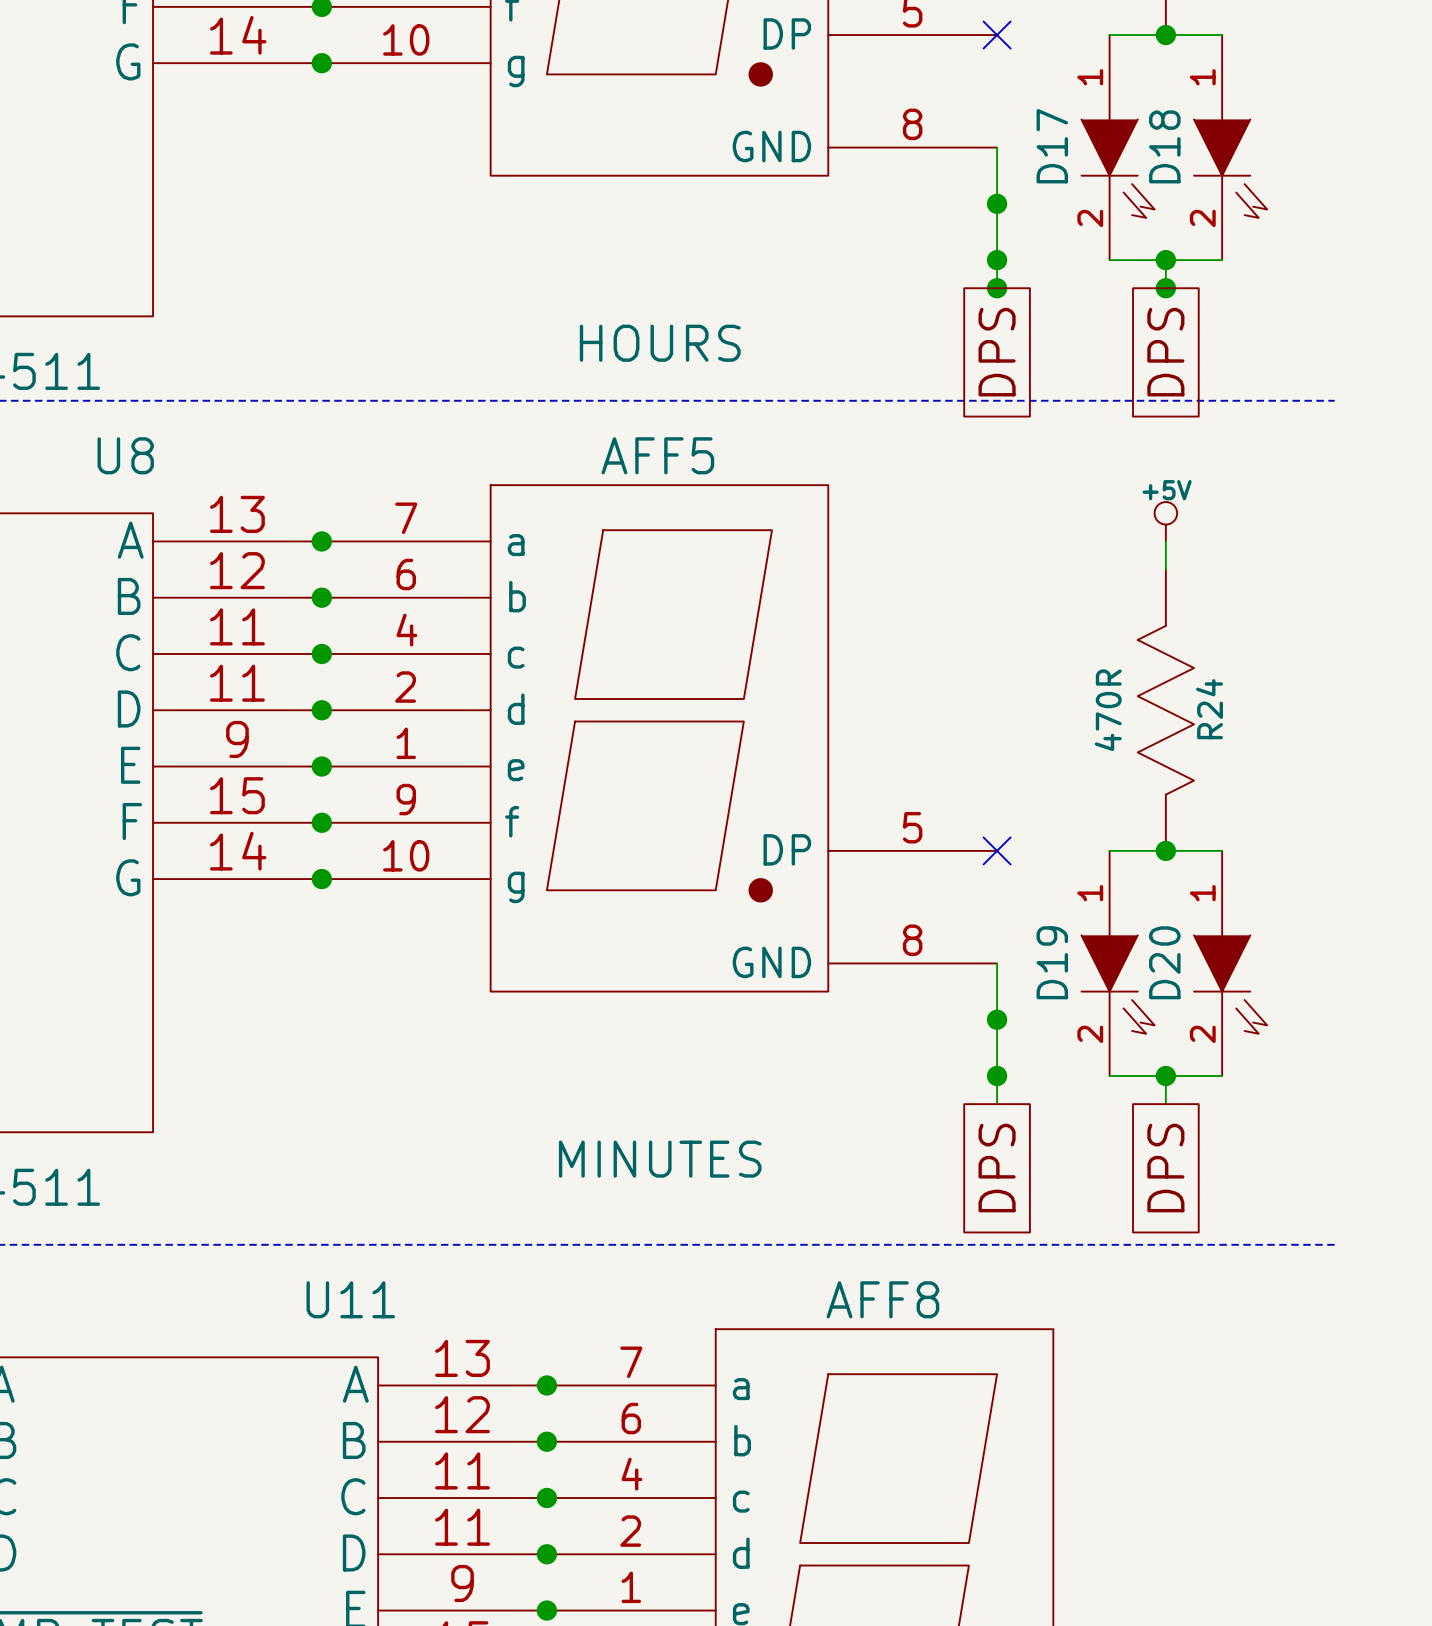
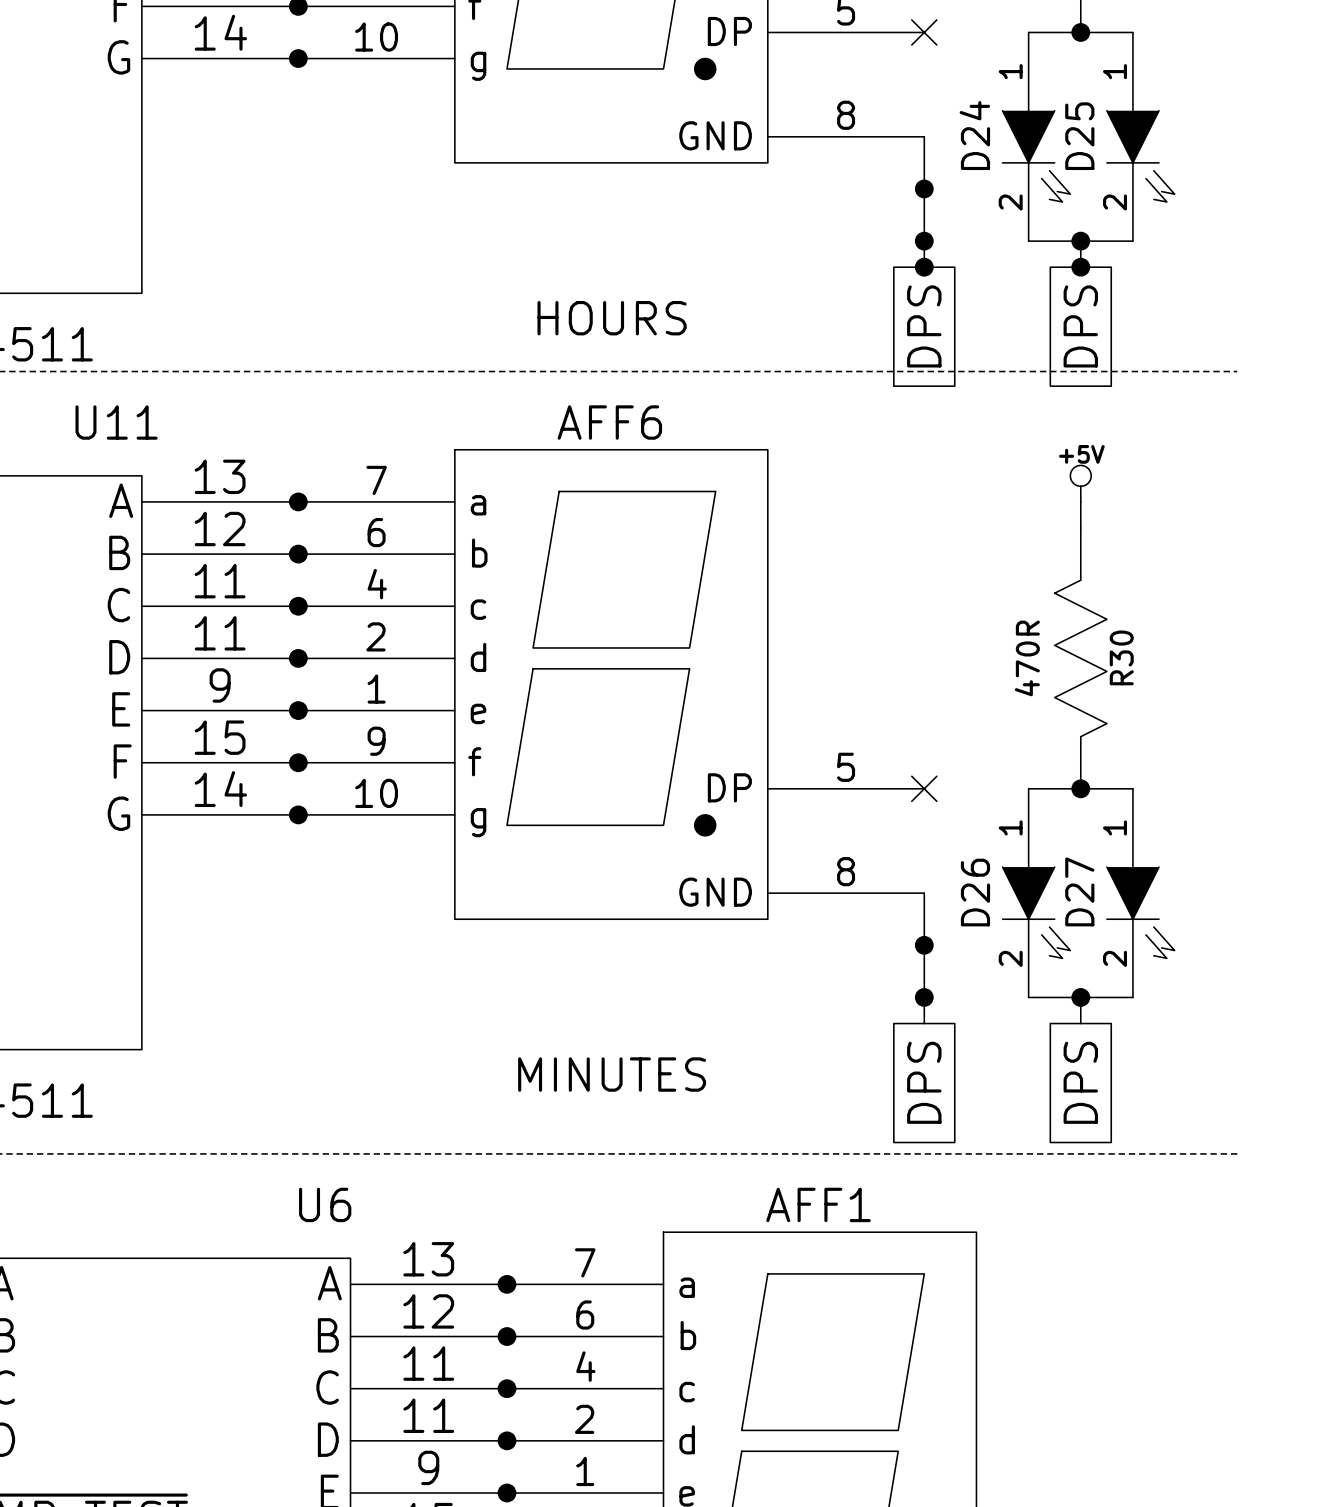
D17 name: D17 (1052, 146) -> D24 (974, 135)
D18 name: D18 (1164, 146) -> D25 (1079, 136)
U8 name: U8 (125, 455) -> U11 (116, 422)
AFF5 name: AFF5 (657, 455) -> AFF6 (609, 422)
R24 name: R24 (1209, 709) -> R30 (1121, 657)
D19 name: D19 (1052, 962) -> D26 (975, 892)
D20 name: D20 (1164, 962) -> D27 (1079, 891)
U11 name: U11 (350, 1299) -> U6 (325, 1204)
AFF8 name: AFF8 (882, 1299) -> AFF1 (818, 1204)

